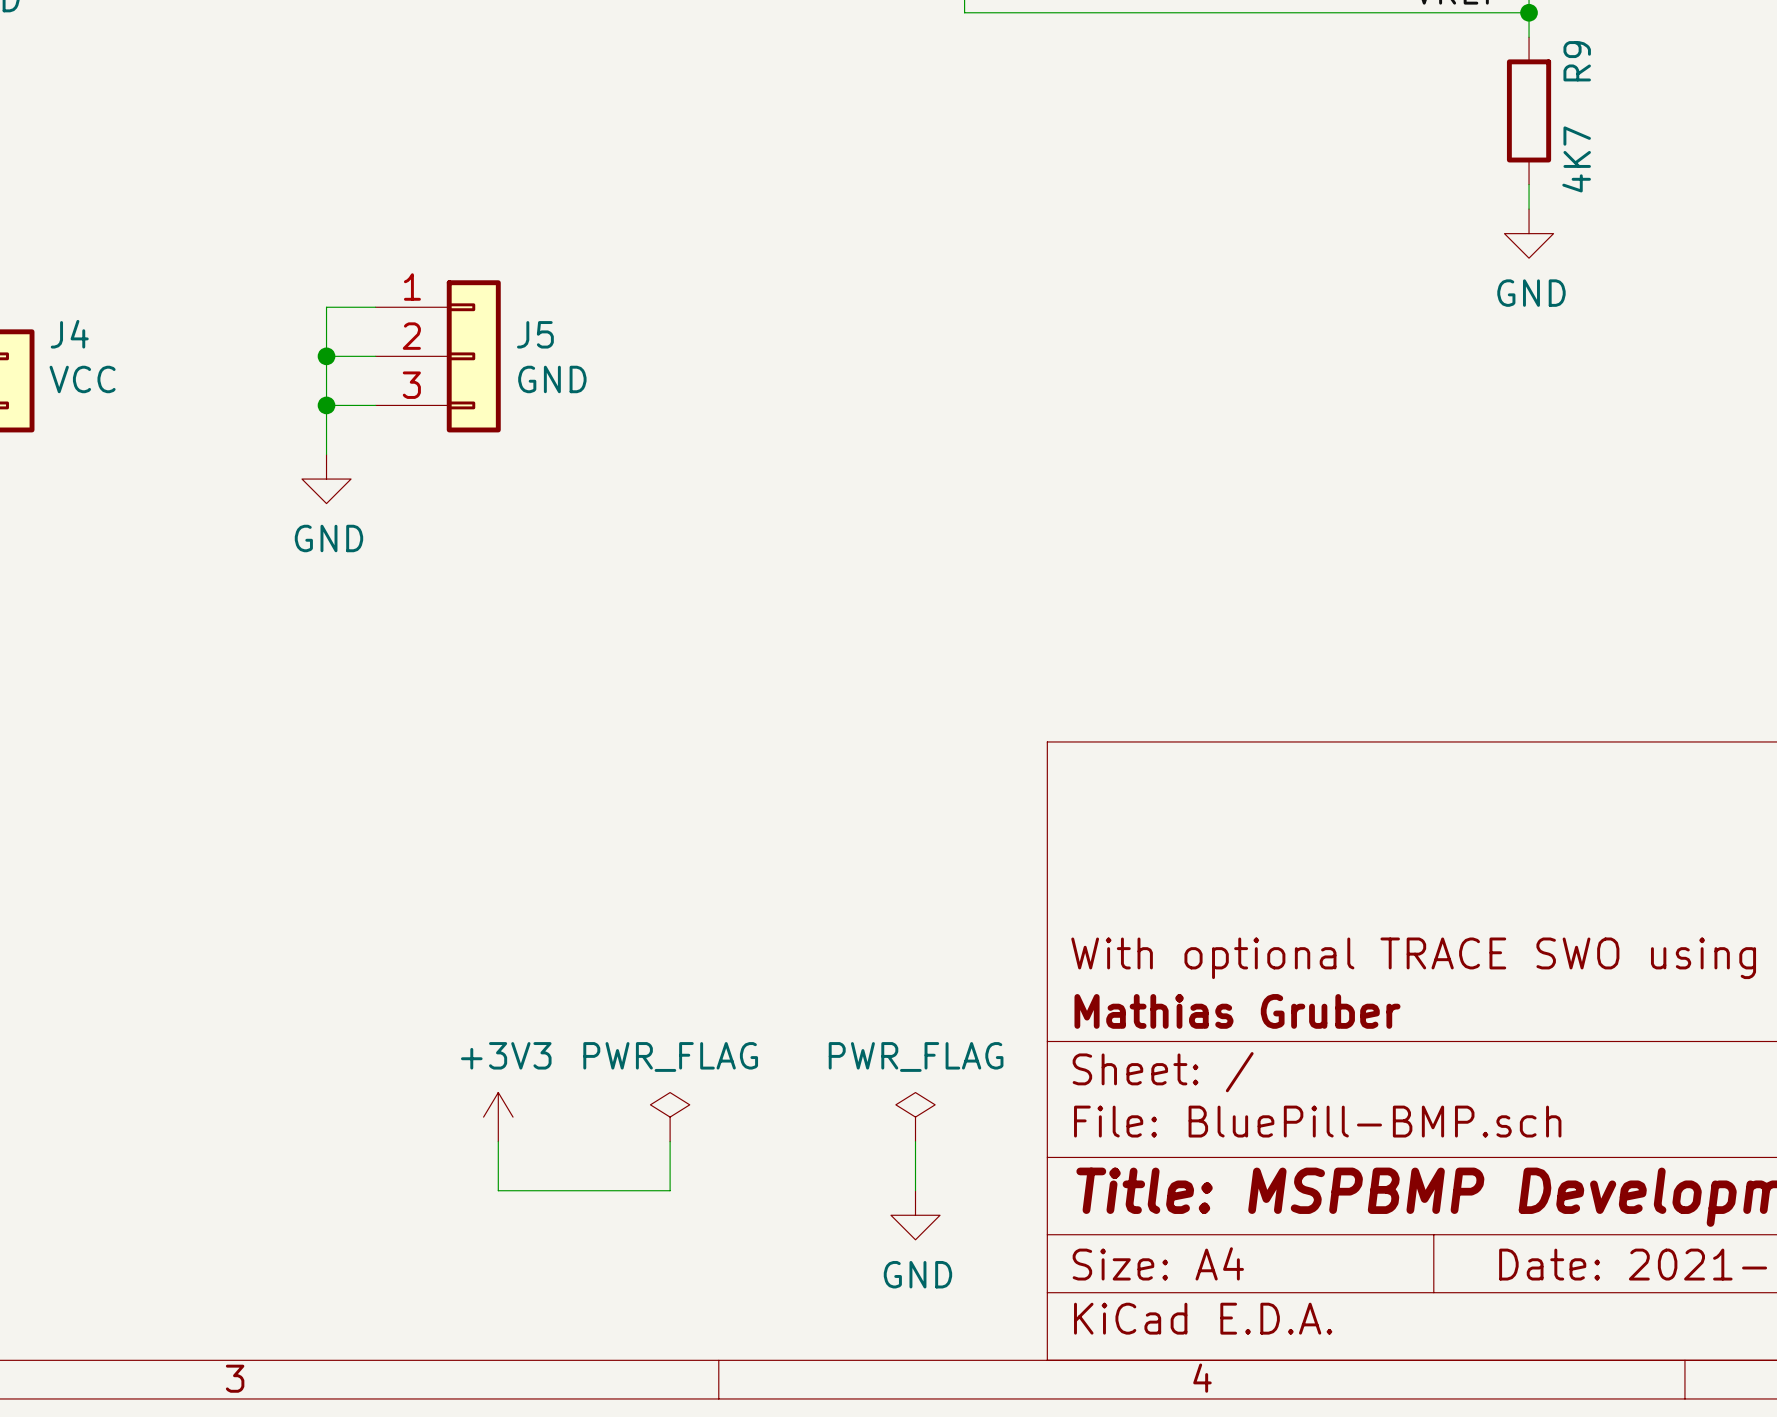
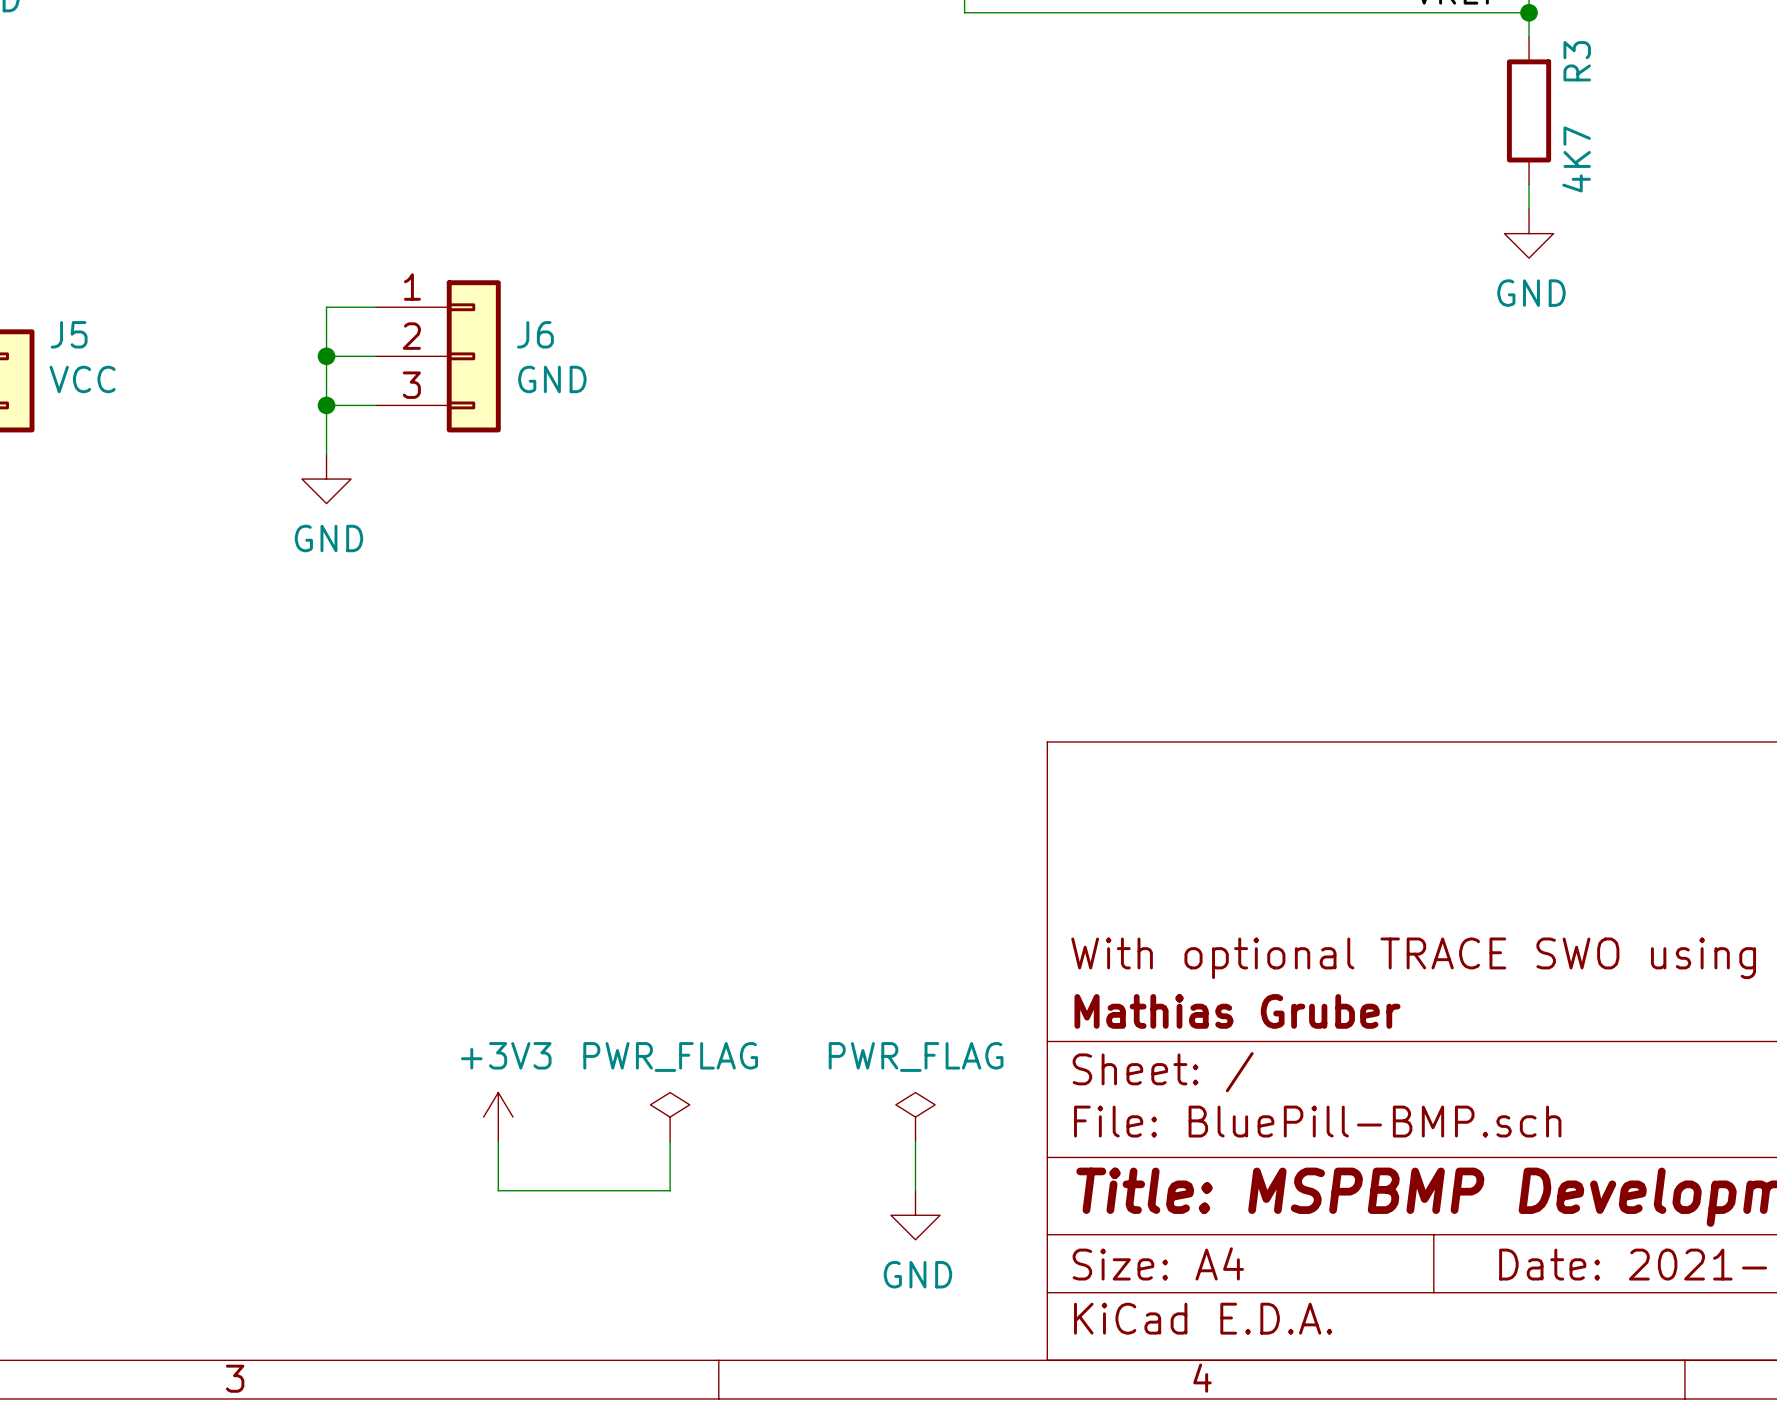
R9 name: R9 (1577, 61) -> R3 (1577, 61)
J4 name: J4 (69, 334) -> J5 (69, 334)
J5 name: J5 (535, 334) -> J6 (535, 334)

